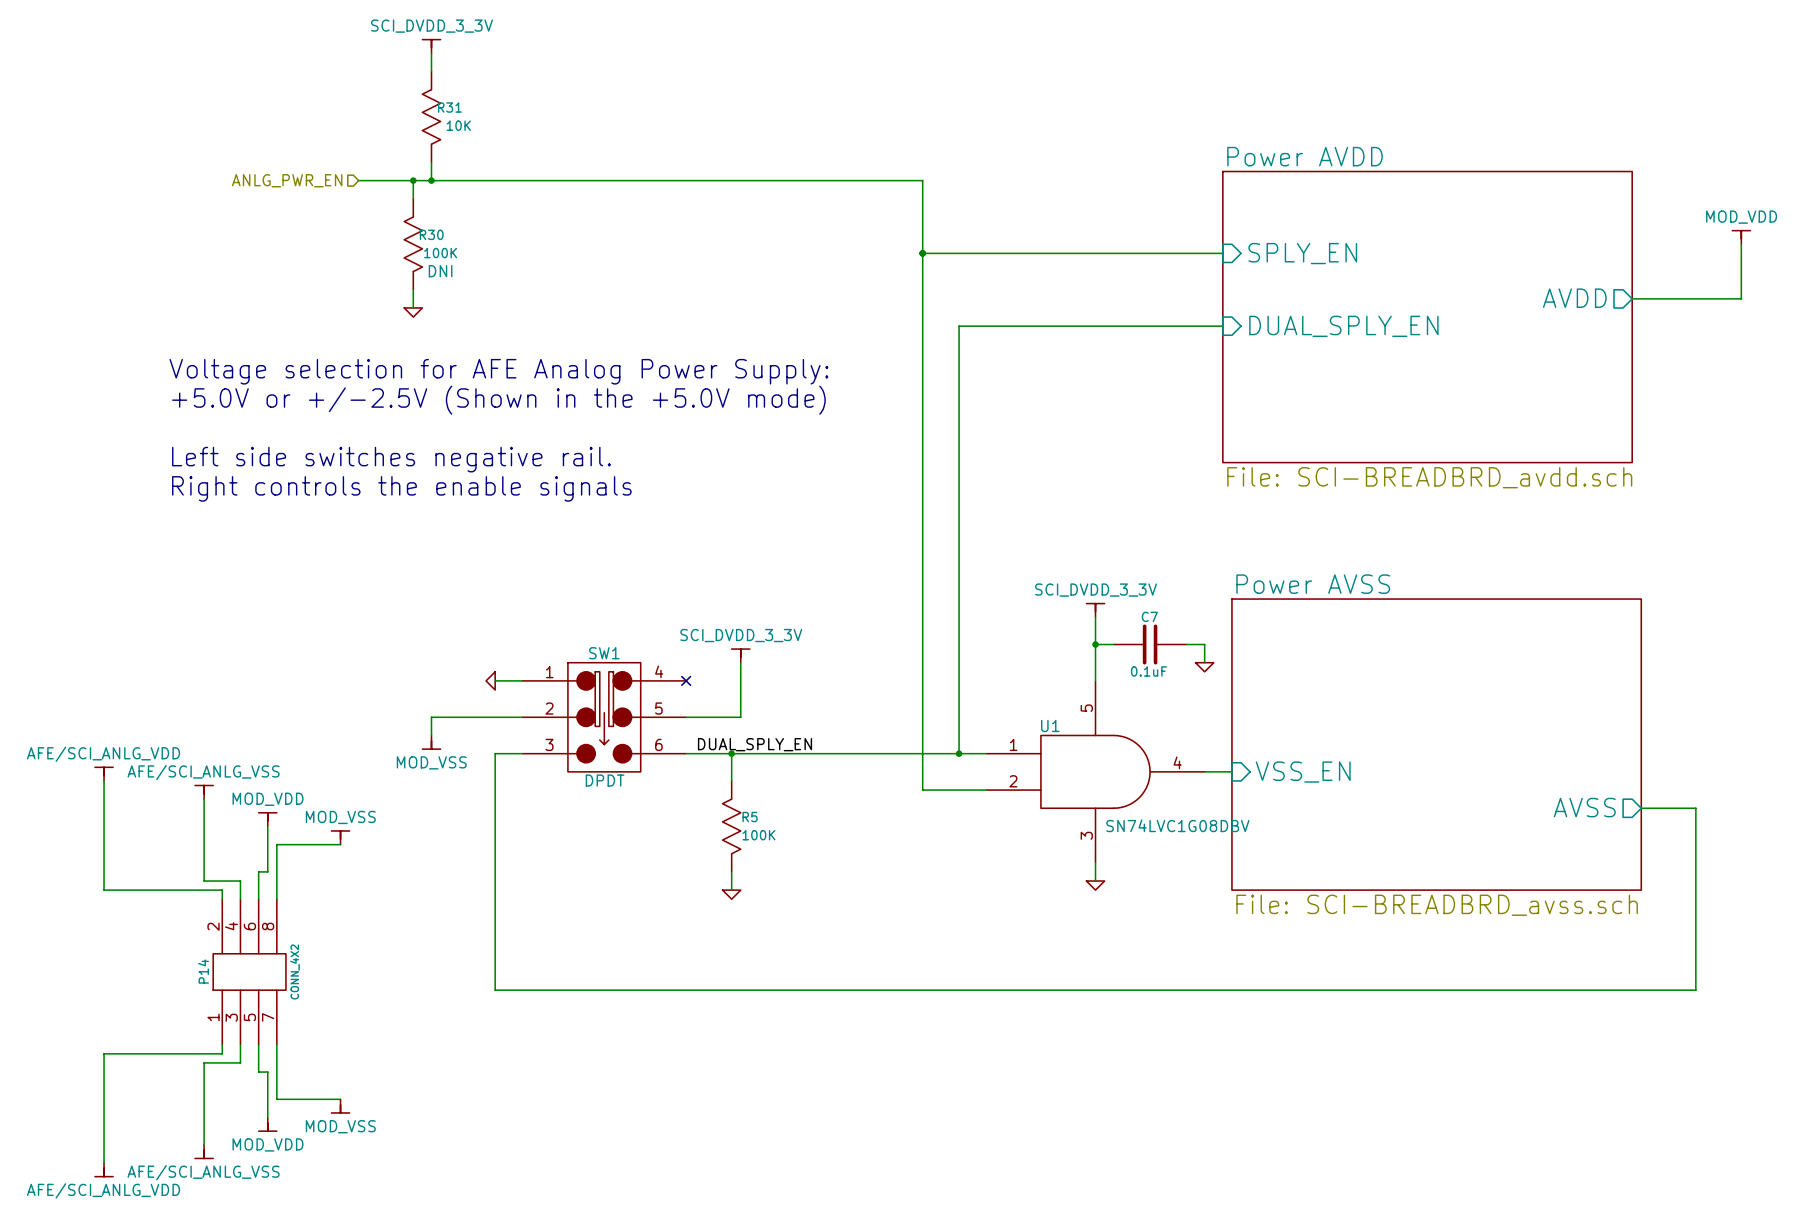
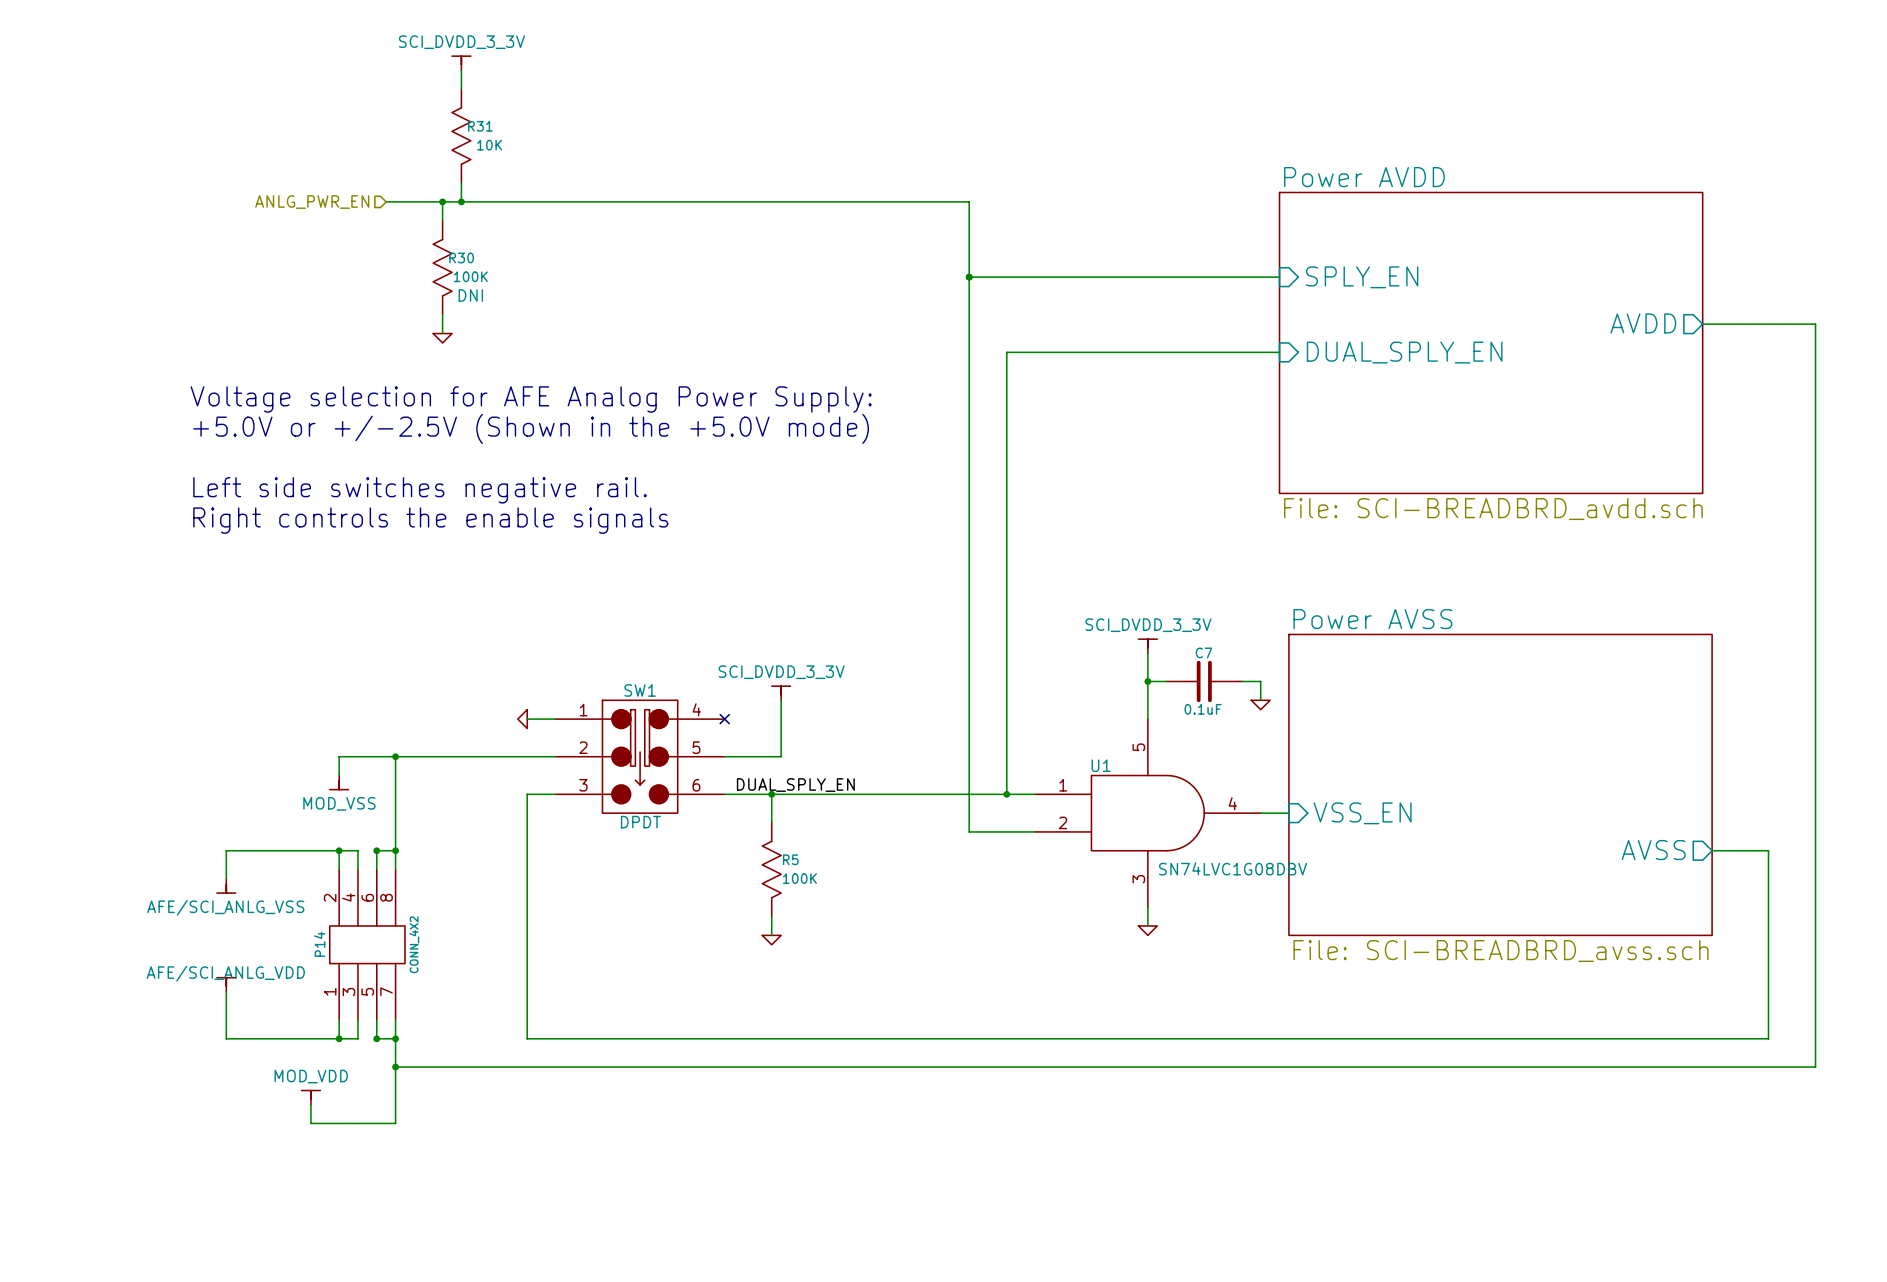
power symbol: MOD_VDD (1741, 237) -> none
wire: (1741, 244) (1741, 298) -> (395, 1067) (1815, 1067) (1815, 324)
wire: none -> (395, 756) (395, 869)
junction: none -> (395, 756)
wire: (431, 717) (431, 735) -> (461, 756) (339, 756) (339, 775)
power symbol: none -> MOD_VSS (339, 782)
power symbol: MOD_VSS (431, 742) -> none
power symbol: AFE/SCI_ANLG_VDD (104, 774) -> none
wire: (104, 780) (104, 890) (222, 890) (222, 899) -> none
power symbol rotation: 0° (204, 792) -> 180° (226, 886)
power symbol position: AFE/SCI_ANLG_VSS (204, 792) -> AFE/SCI_ANLG_VSS (226, 886)
wire: (204, 799) (204, 808) -> (357, 869) (357, 850) (226, 850)
junction: none -> (339, 850)
junction: none -> (376, 850)
wire: none -> (395, 850) (376, 850) (376, 869)
junction: none -> (395, 850)
power symbol: MOD_VDD (267, 819) -> none
wire: (267, 826) (267, 871) (258, 871) (258, 899) -> none
wire: (204, 835) (204, 881) (240, 881) (240, 899) -> none
power symbol: MOD_VSS (340, 837) -> none
wire: (340, 844) (276, 844) (276, 899) -> none
power symbol: none -> AFE/SCI_ANLG_VDD (226, 984)
wire: none -> (226, 991) (226, 1038) (357, 1038) (357, 1020)
P14 position: (249, 971) -> (367, 944)
wire: none -> (339, 1020) (339, 1038)
wire: none -> (376, 1020) (376, 1038) (395, 1038)
wire: none -> (395, 1020) (395, 1123) (310, 1123) (310, 1104)
junction: none -> (339, 1038)
junction: none -> (376, 1038)
junction: none -> (395, 1038)
junction: none -> (395, 1067)
wire: (222, 1044) (222, 1053) (104, 1053) (104, 1163) -> none
wire: (240, 1044) (240, 1062) (204, 1062) (204, 1144) -> none
wire: (258, 1044) (258, 1072) (267, 1072) (267, 1117) -> none
wire: (276, 1044) (276, 1099) (340, 1099) -> none
power symbol: MOD_VSS (340, 1106) -> none
power symbol rotation: 0° (267, 1124) -> 180° (310, 1097)
power symbol position: MOD_VDD (267, 1124) -> MOD_VDD (310, 1097)
power symbol: AFE/SCI_ANLG_VSS (204, 1151) -> none
power symbol: AFE/SCI_ANLG_VDD (104, 1169) -> none

